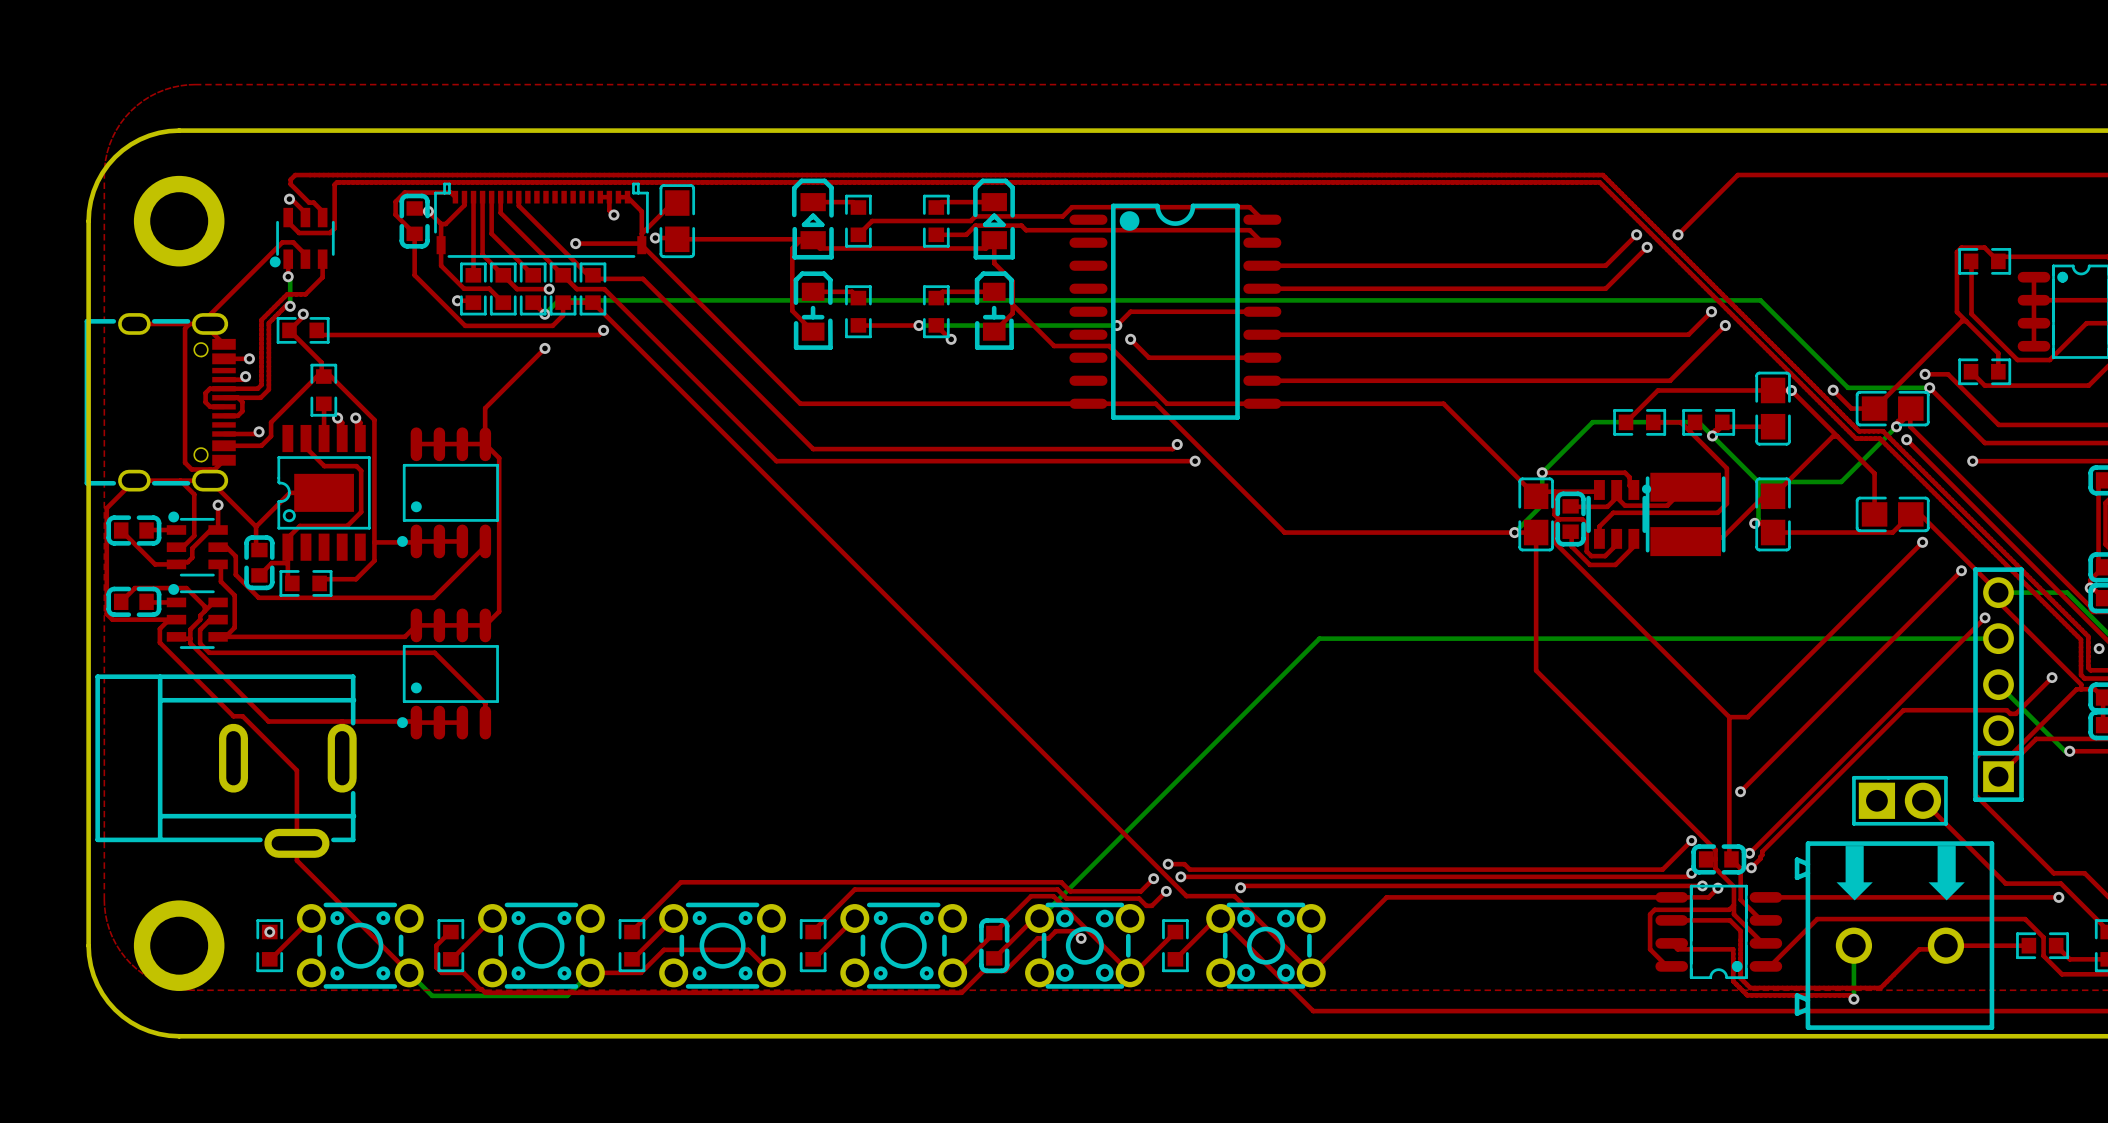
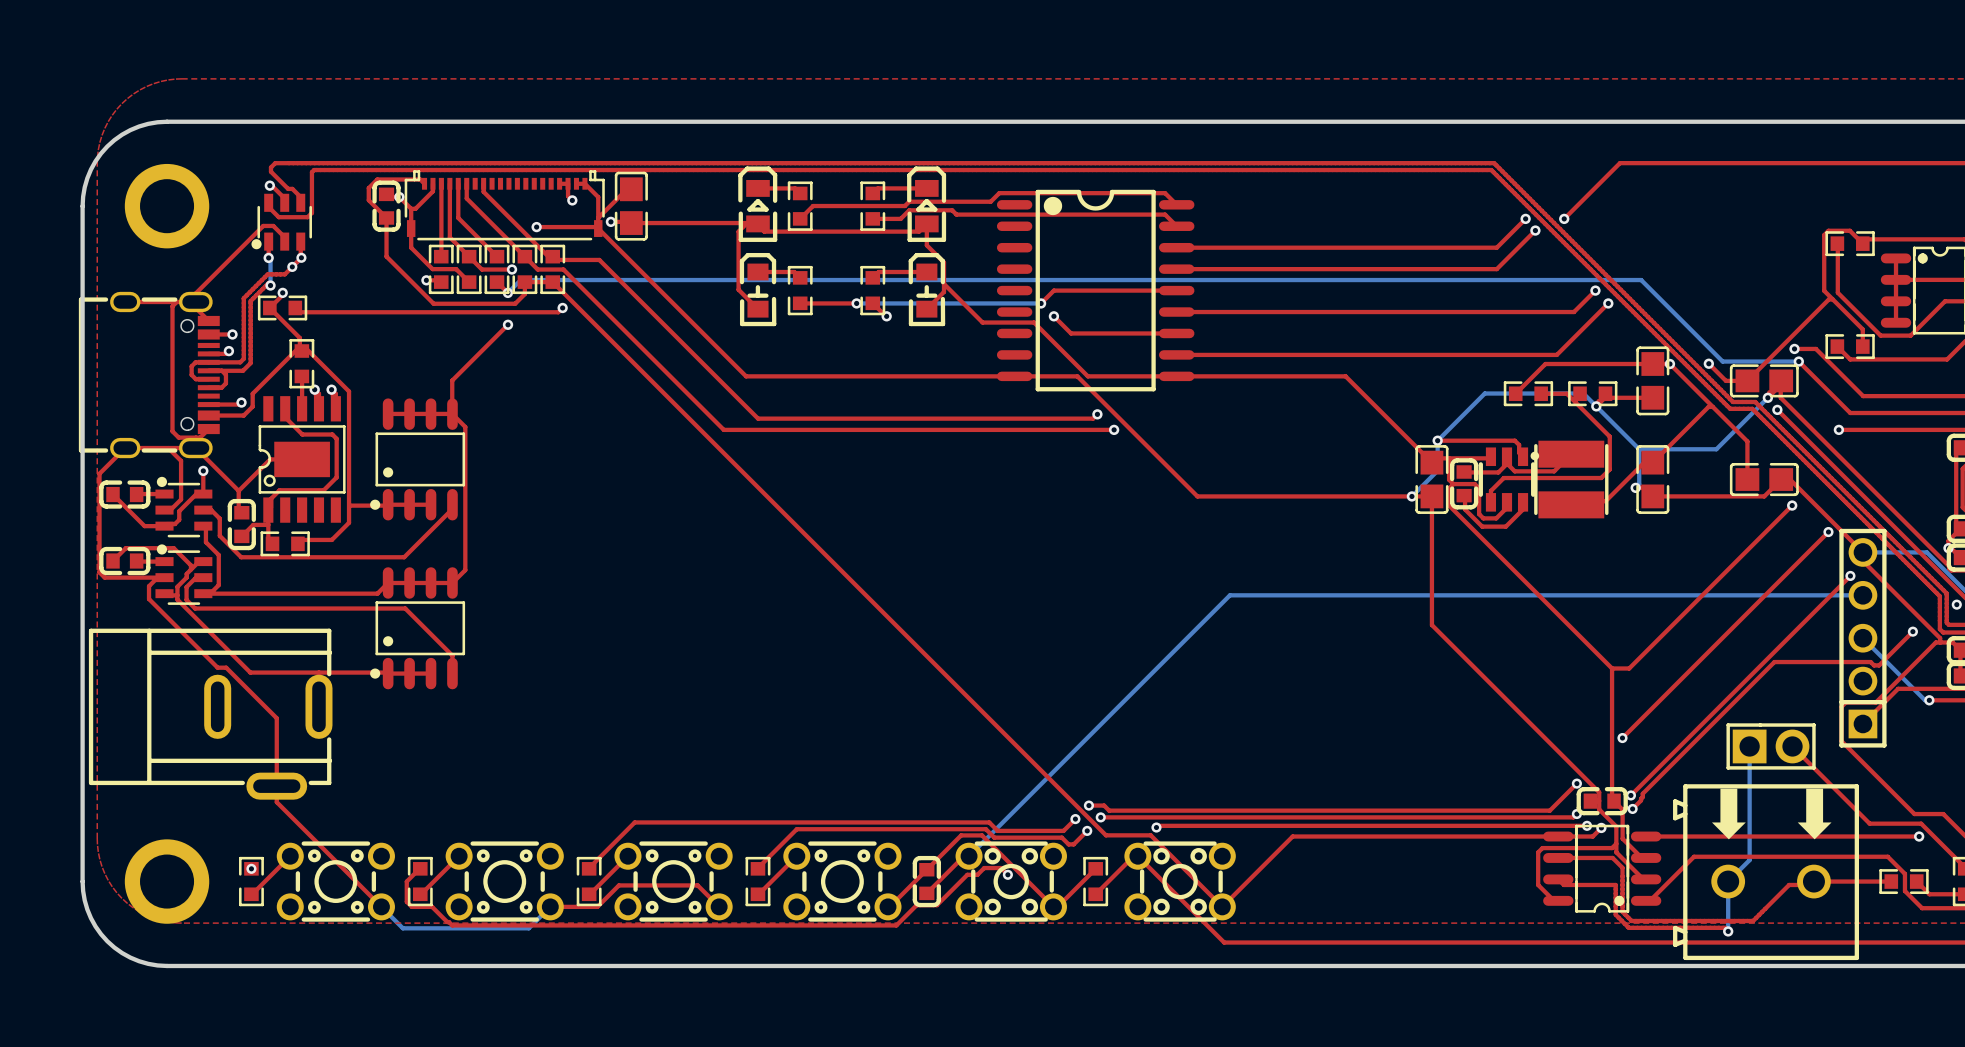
via: none -> (301, 257)
via: none -> (292, 266)
bottom track: none -> (1749, 746) (1749, 860) (1728, 881)

